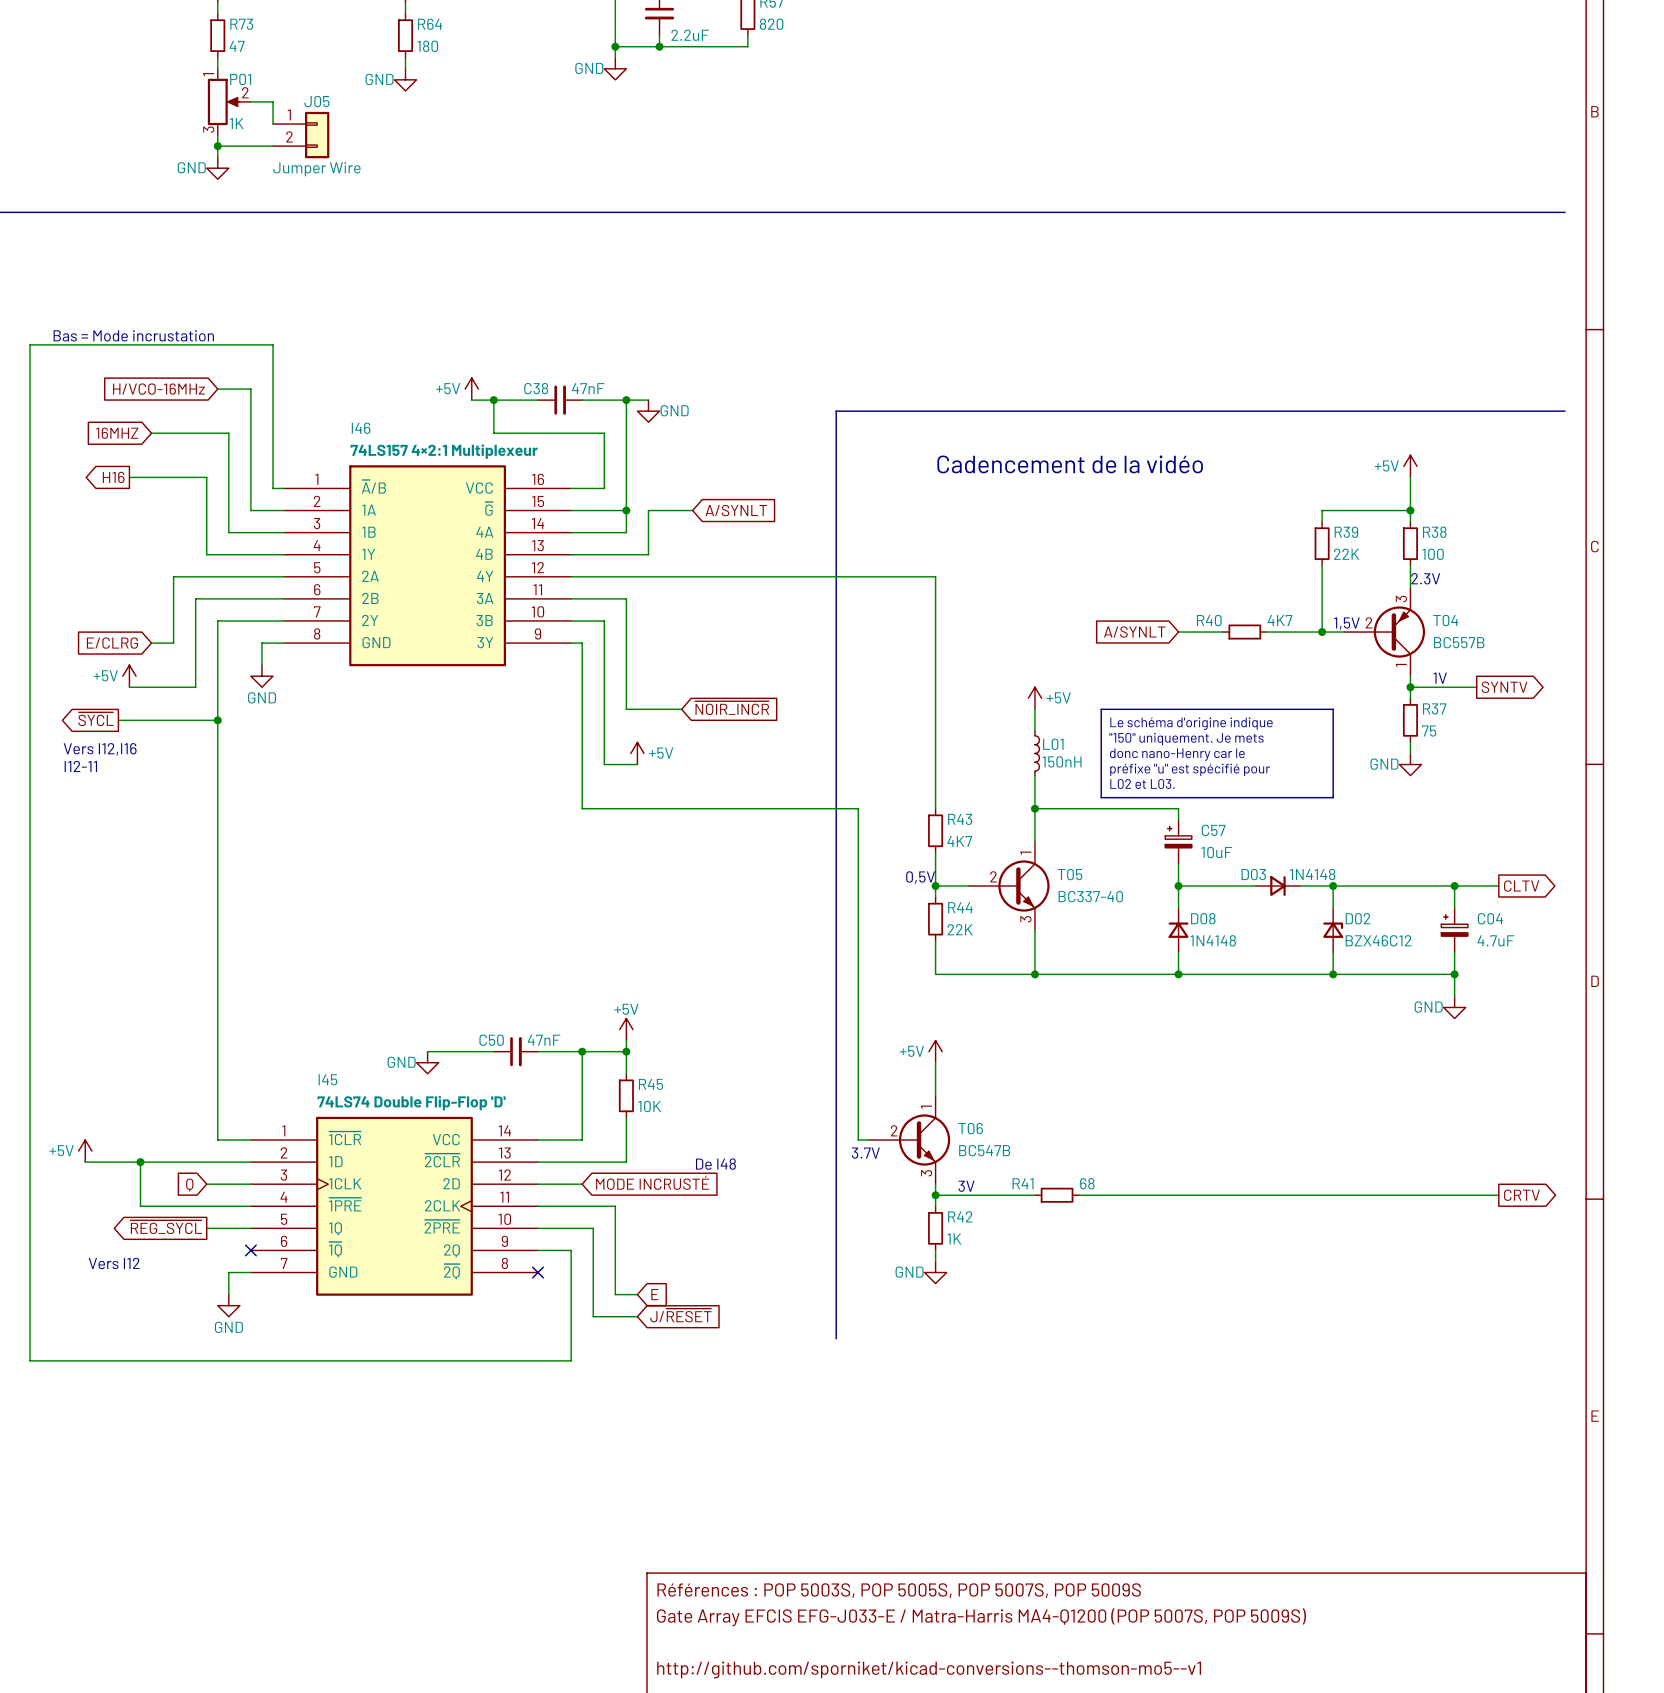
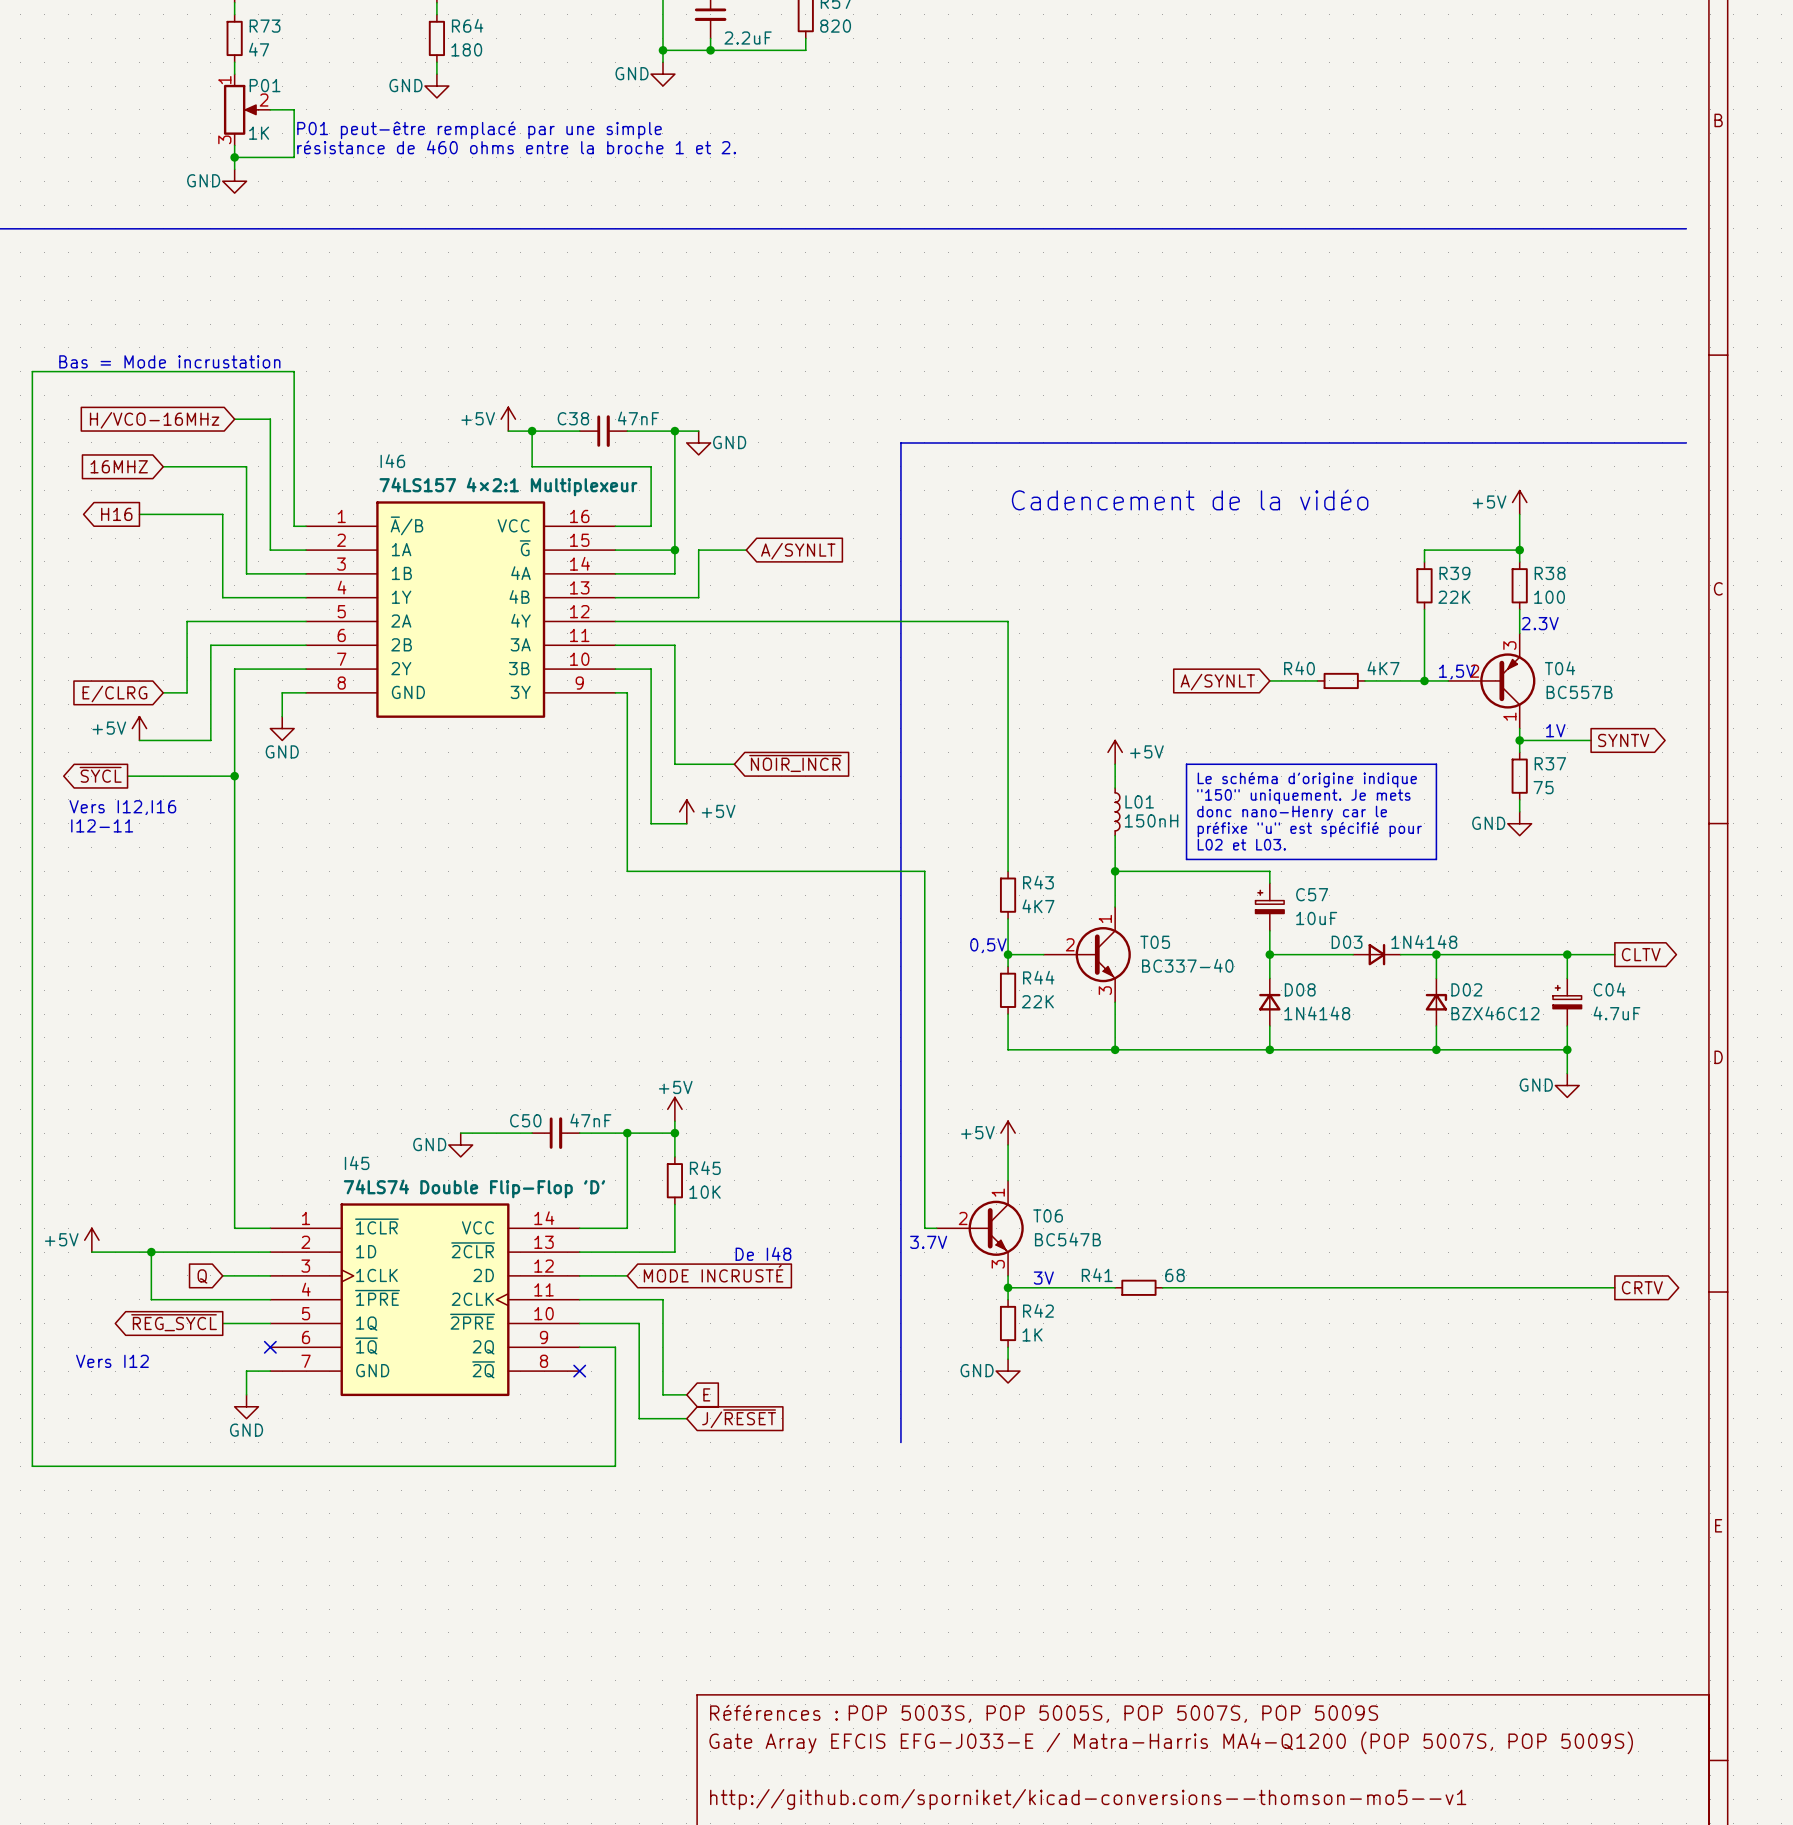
text: none -> P01 peut-être remplacé par une simple (479, 130)
wire: none -> (294, 133) (294, 157)
J05: Jumper Wire (301, 135) -> none
text: none -> résistance de 460 ohms entre la broche 1 et 2. (516, 147)

